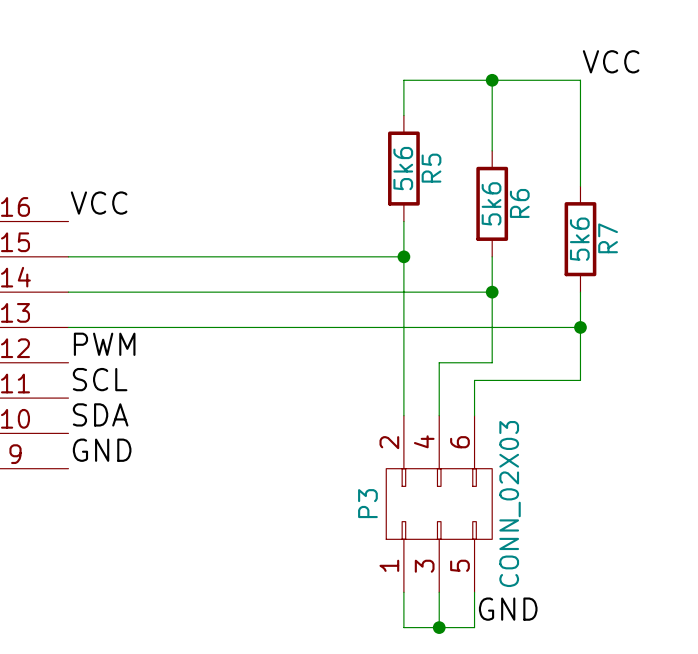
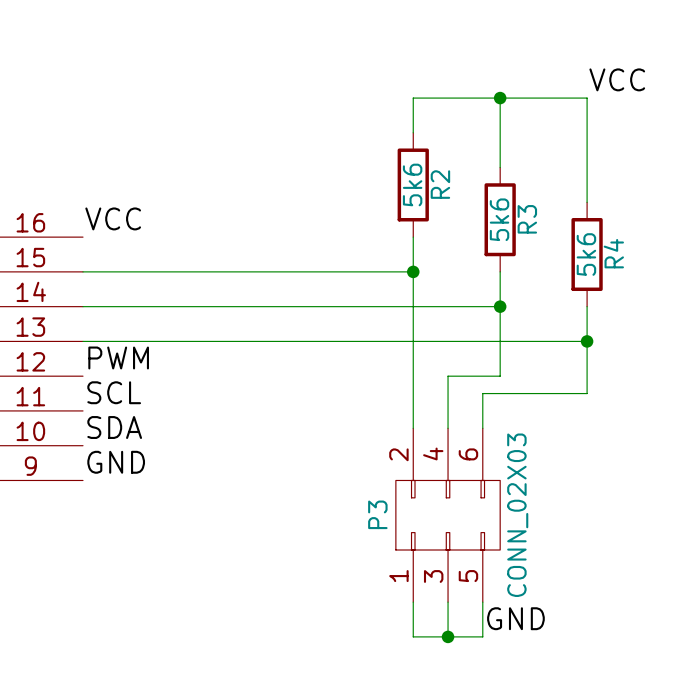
R5 name: R5 (431, 168) -> R2 (440, 184)
R6 name: R6 (519, 203) -> R3 (527, 219)
R7 name: R7 (608, 238) -> R4 (613, 253)

